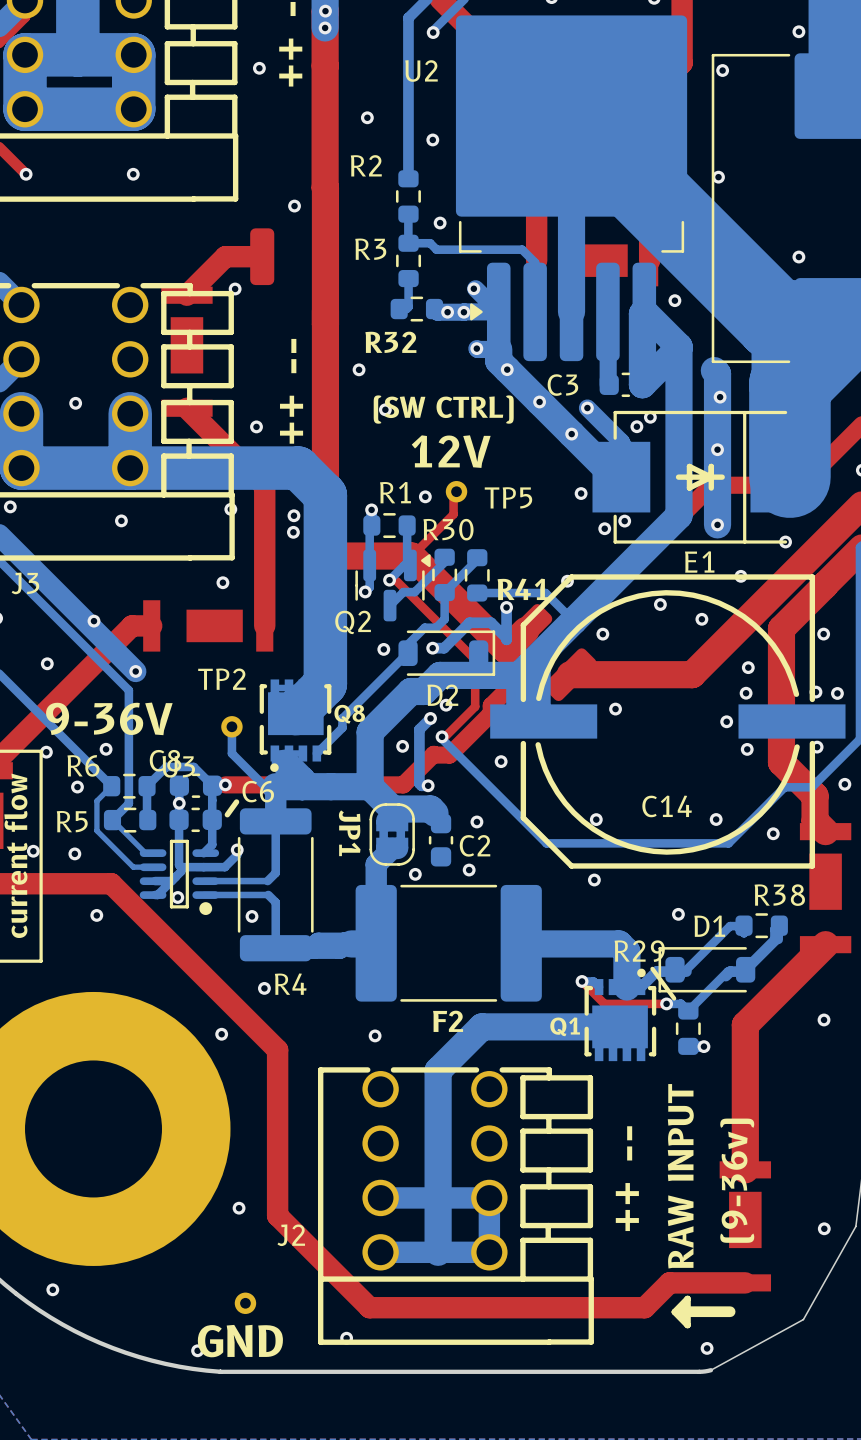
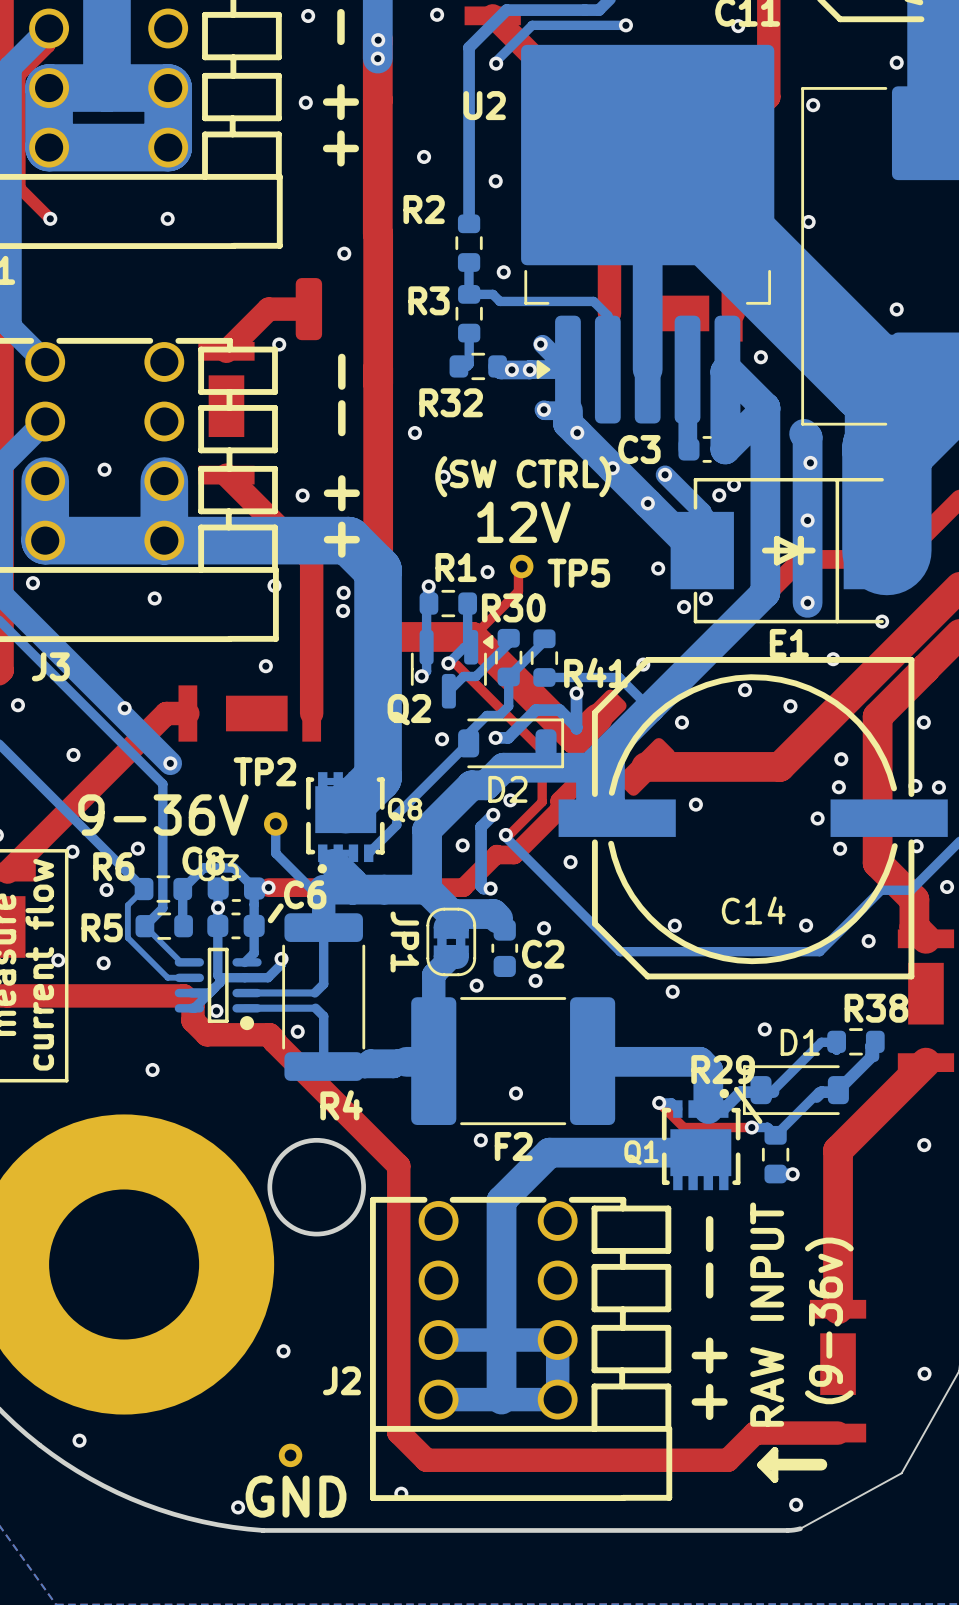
top track: (111, 883) (277, 1050) (277, 1215) (344, 1282) -> (143, 995) (184, 995) (192, 1004) (192, 1020) (207, 1034) (269, 1034) (398, 1165) (398, 1432)
via position: (96, 915) -> (152, 1069)
via: none -> (516, 1093)
via: (264, 988) -> none
round board edge: none -> [267, 1137, 366, 1237]
via: (221, 1034) -> none
via position: (375, 1035) -> (480, 1140)

